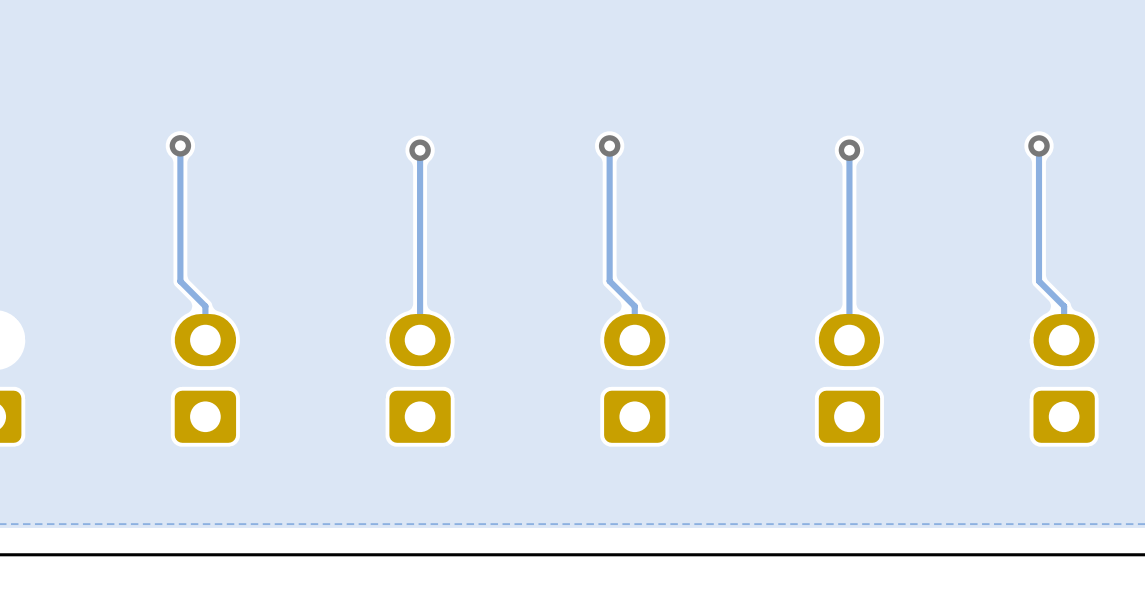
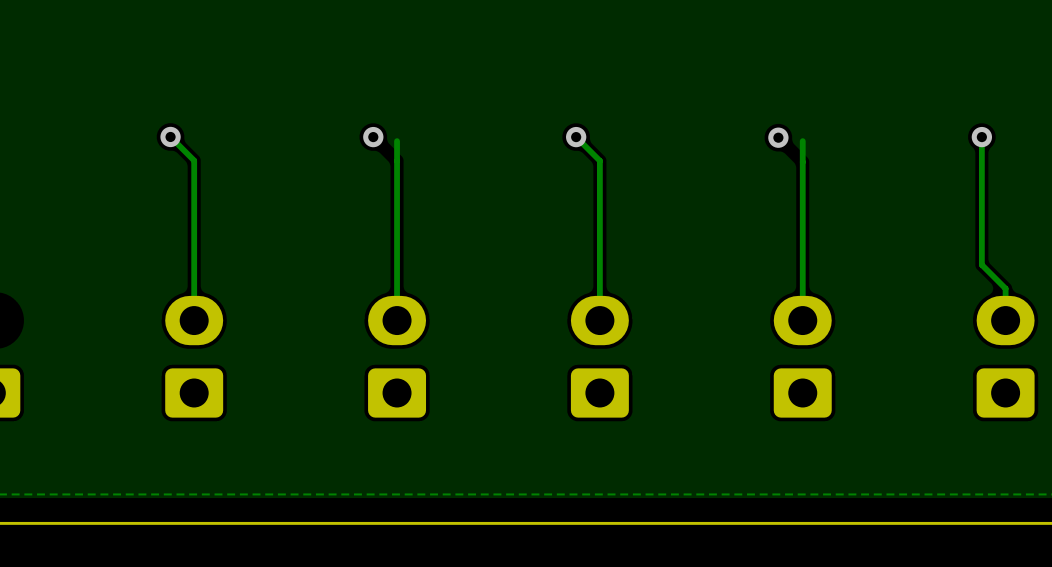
track: (180, 145) (180, 281) (205, 306) -> (170, 136) (194, 160) (194, 288)
track: (609, 145) (609, 281) (634, 306) -> (576, 137) (599, 160) (599, 288)
via position: (420, 150) -> (373, 137)
via position: (849, 150) -> (778, 137)

